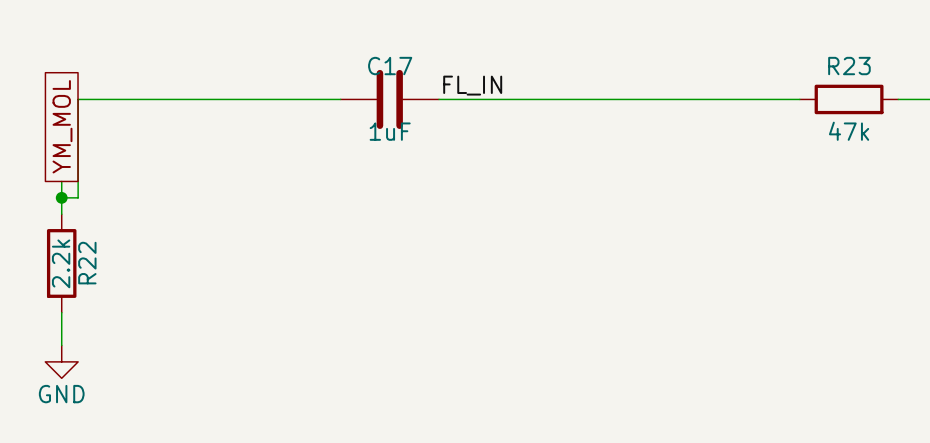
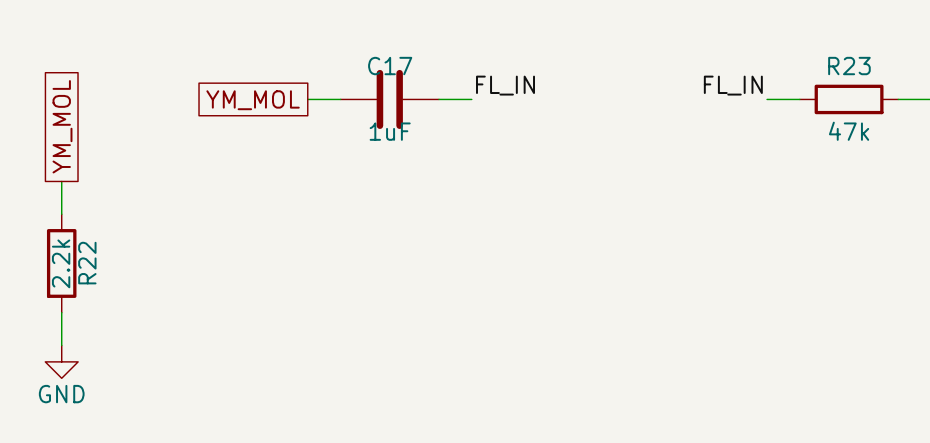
label position: FL_IN (472, 85) -> FL_IN (505, 85)
label: none -> FL_IN (733, 85)
wire: (307, 99) (78, 99) (78, 197) (61, 197) -> none
wire: (471, 99) (767, 99) -> none
global label: none -> YM_MOL (253, 100)
junction: (61, 197) -> none

